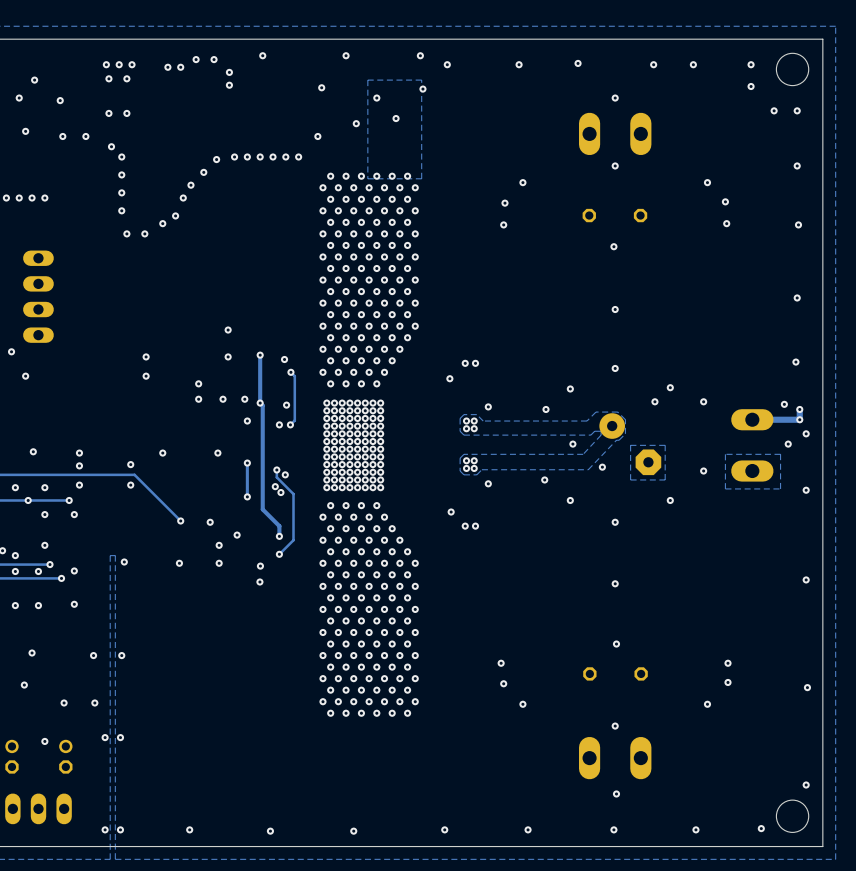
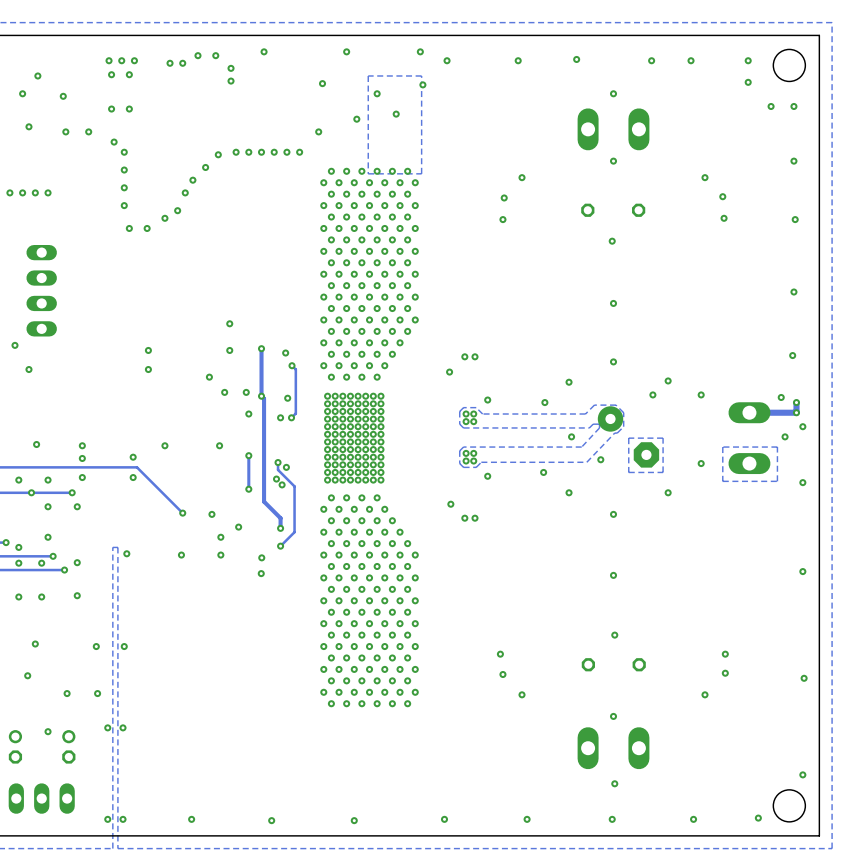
via: (198, 383) -> none
via: none -> (209, 377)
via: (198, 399) -> none

